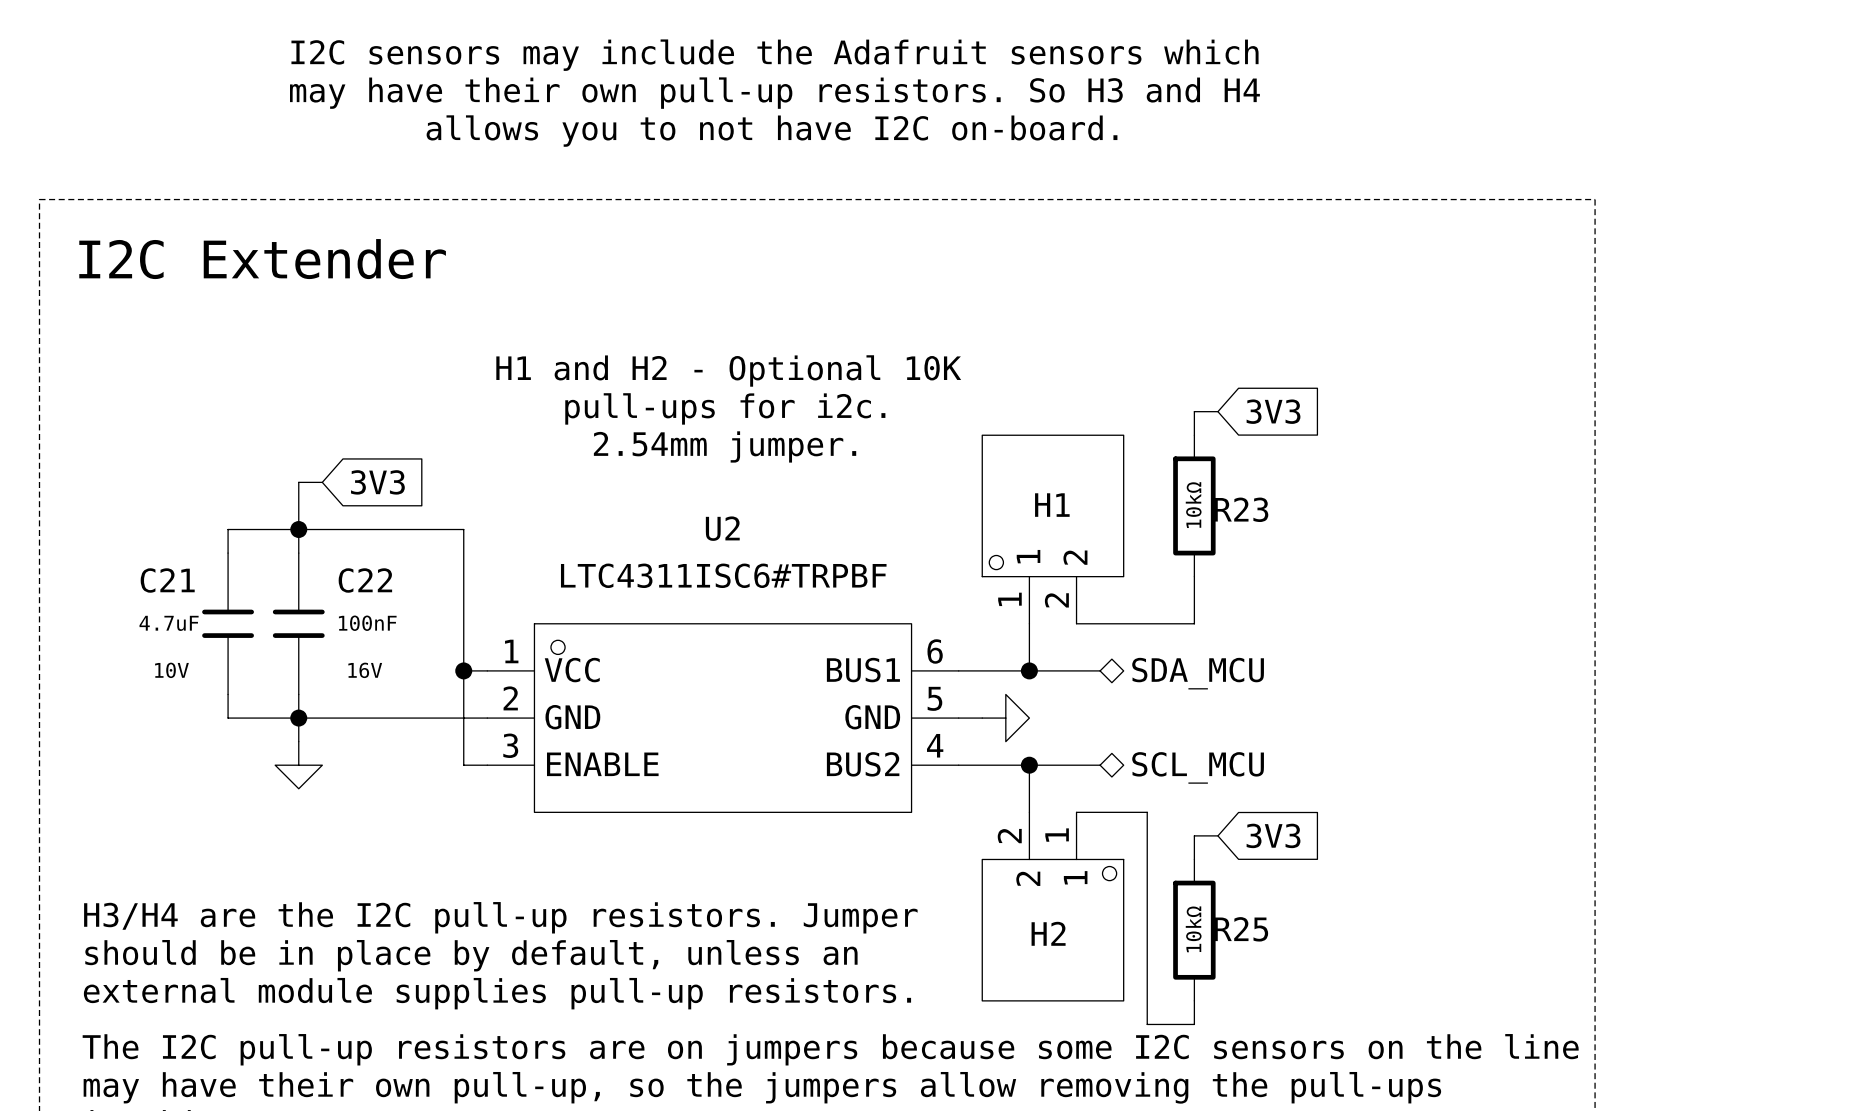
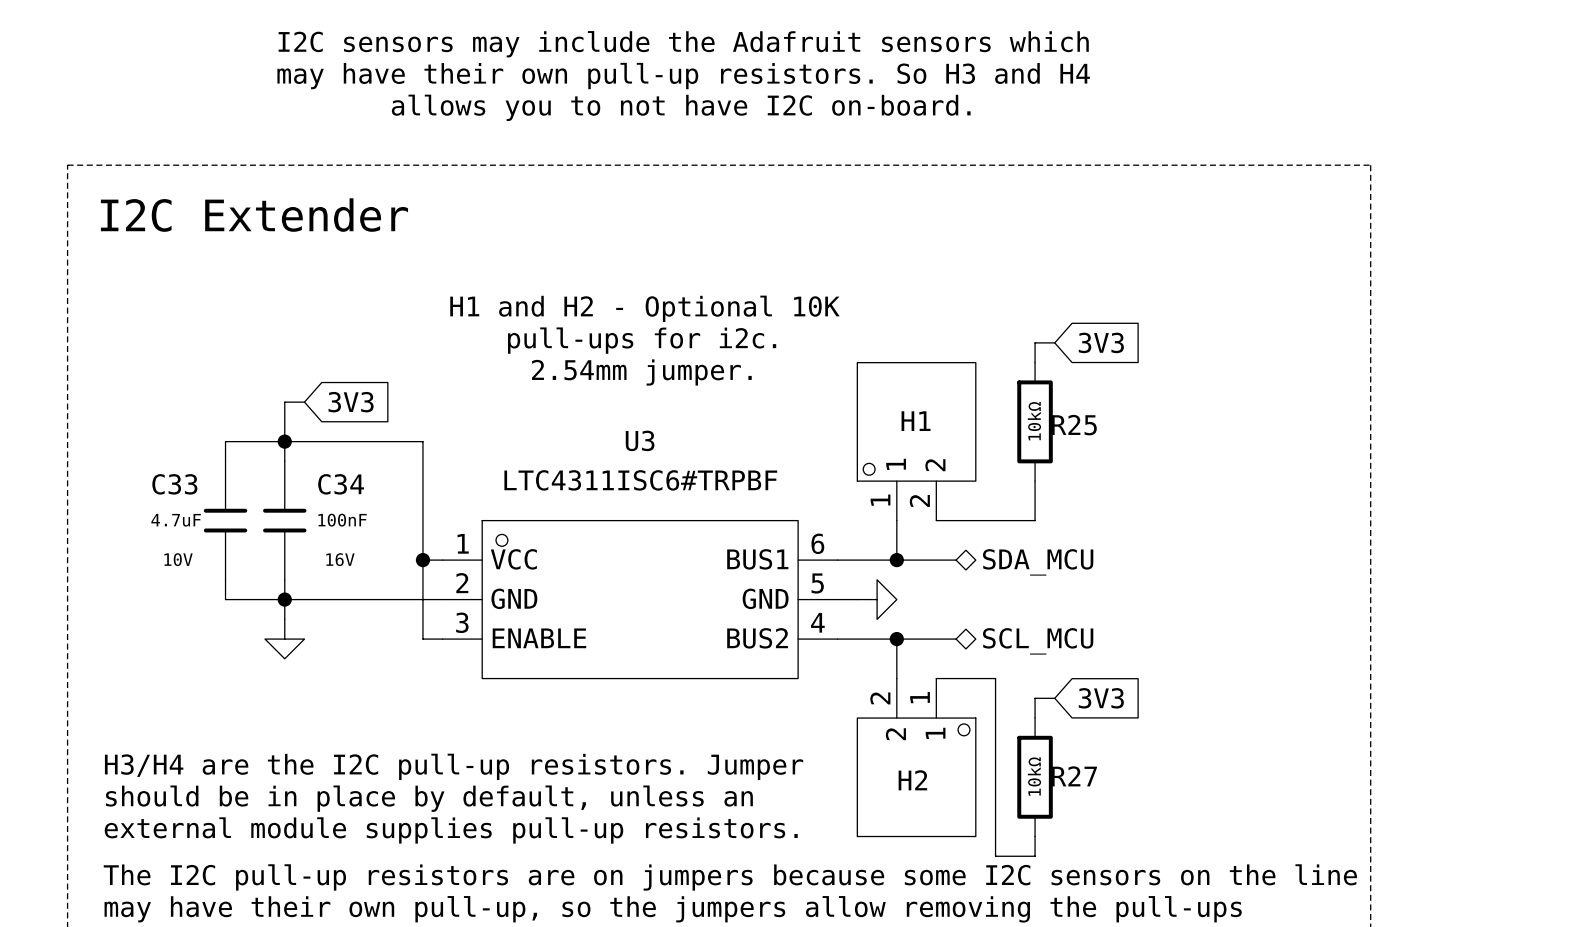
R23 name: R23 (1241, 509) -> R25 (1074, 425)
U2 name: U2 (722, 528) -> U3 (640, 440)
C21 name: C21 (167, 580) -> C33 (174, 484)
C22 name: C22 (365, 580) -> C34 (341, 484)
R25 name: R25 (1241, 929) -> R27 (1074, 776)

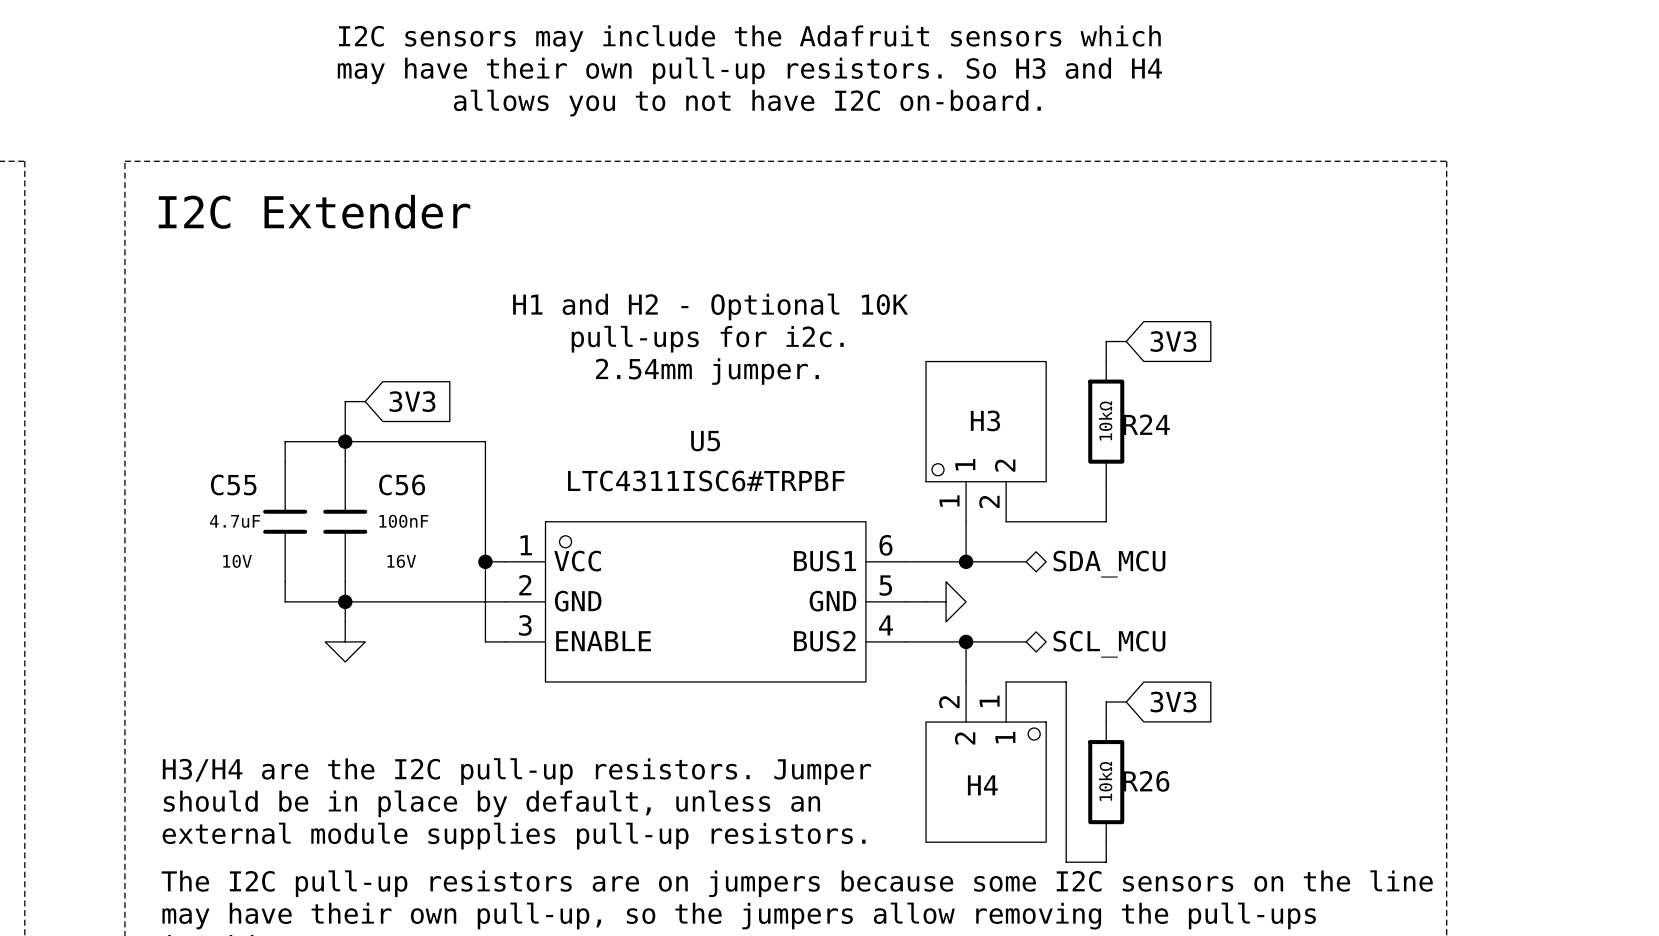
H1 name: H1 (916, 421) -> H3 (985, 420)
R25 name: R25 (1074, 425) -> R24 (1146, 424)
U3 name: U3 (640, 440) -> U5 (705, 441)
C33 name: C33 (174, 484) -> C55 (233, 484)
C34 name: C34 (341, 484) -> C56 (402, 484)
R27 name: R27 (1074, 776) -> R26 (1146, 781)
H2 name: H2 (912, 780) -> H4 (982, 785)

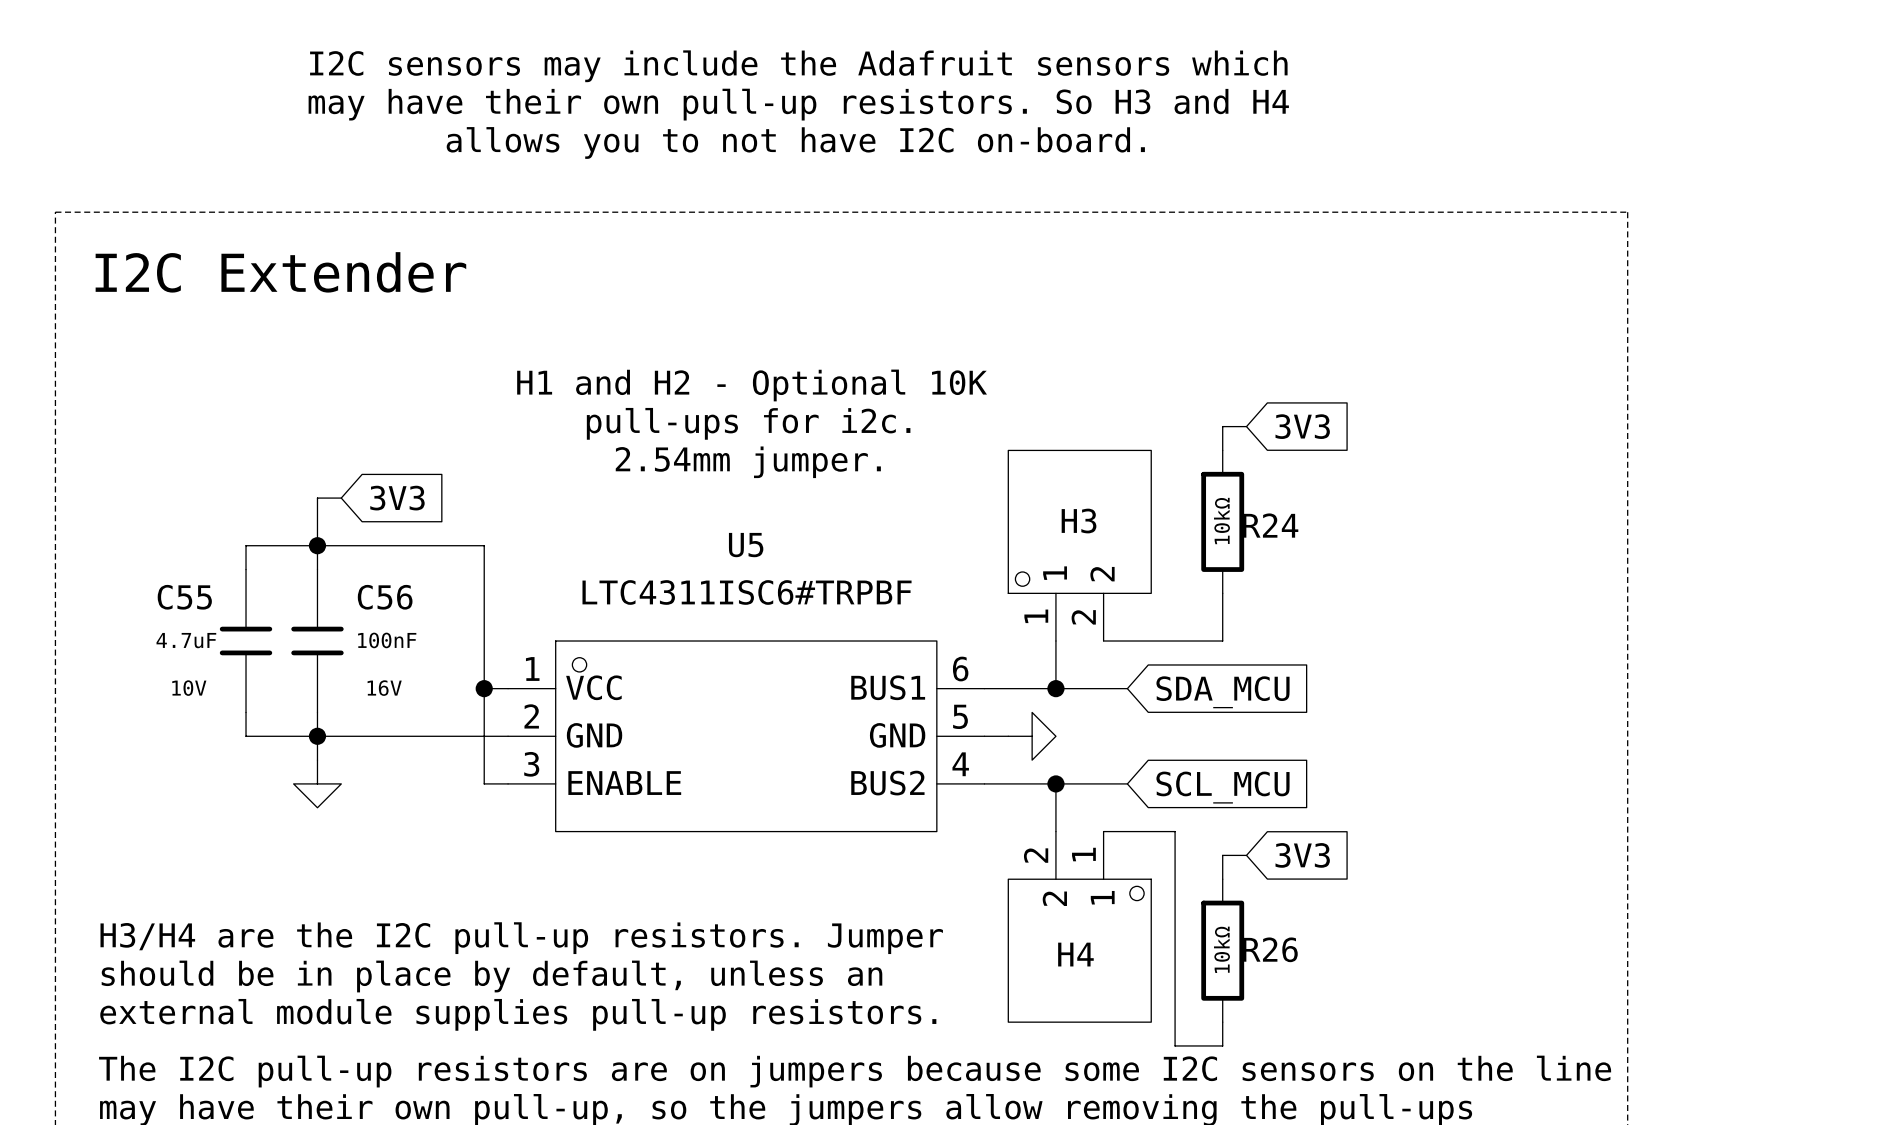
global label: none -> SDA_MCU (1222, 692)
hierarchical label: SDA_MCU (1109, 564) -> none
global label: none -> SCL_MCU (1222, 787)
hierarchical label: SCL_MCU (1109, 644) -> none

